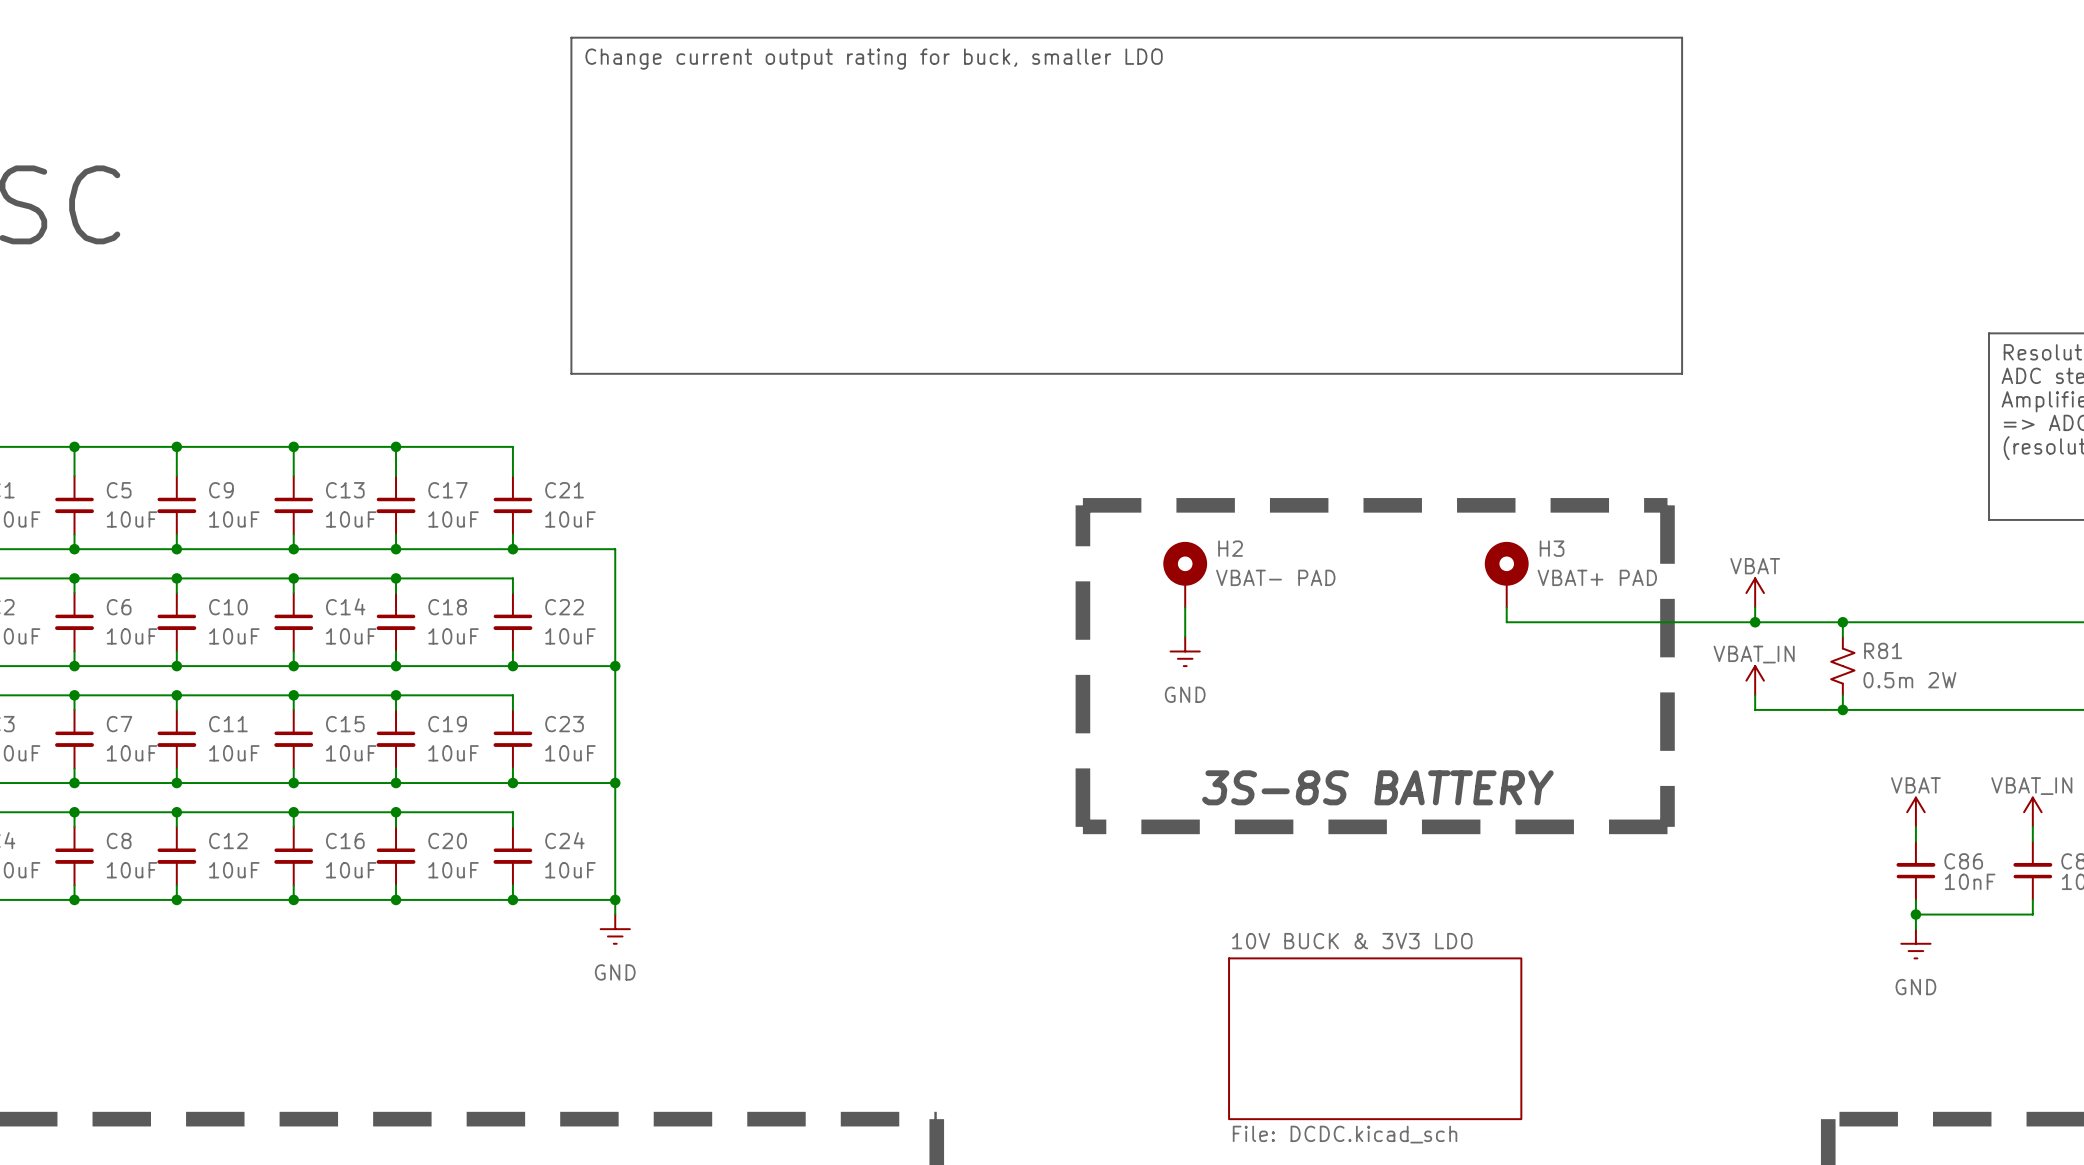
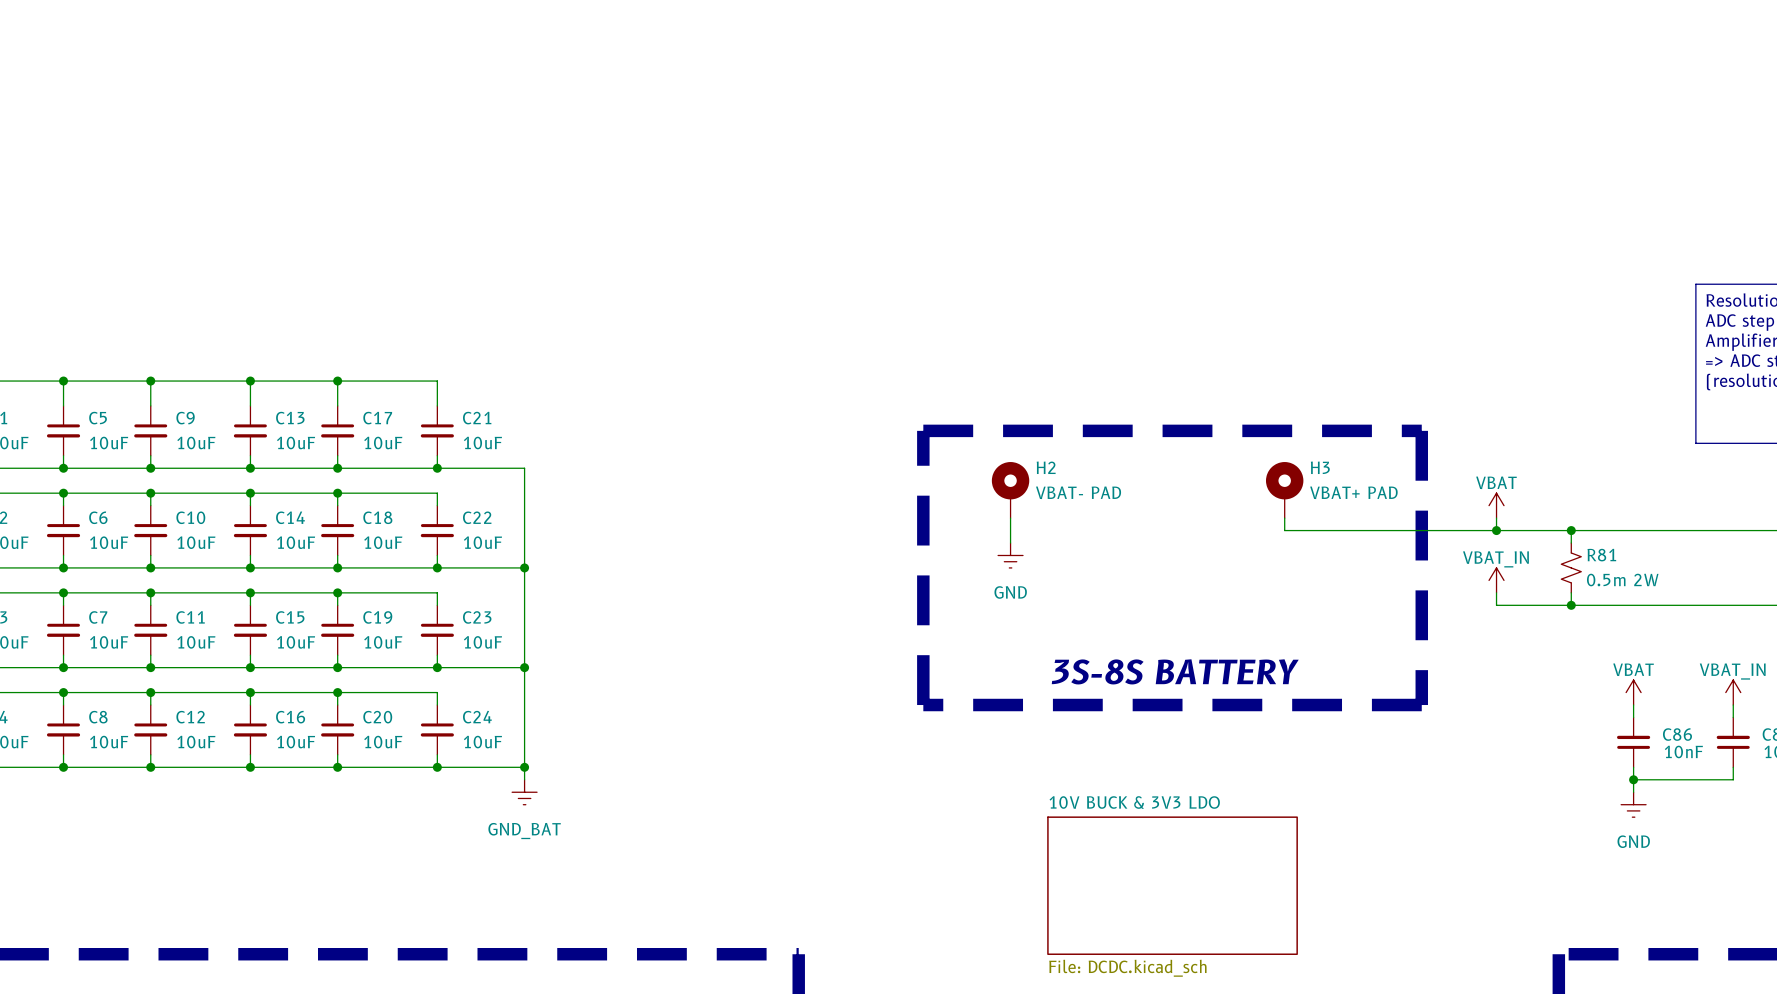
line: (571, 37) (1682, 37) (1682, 373) (571, 373) (571, 37) -> none
text: Change current output rating for buck, smaller LDO (874, 59) -> none
power symbol: GND (615, 929) -> GND_BAT (524, 792)

